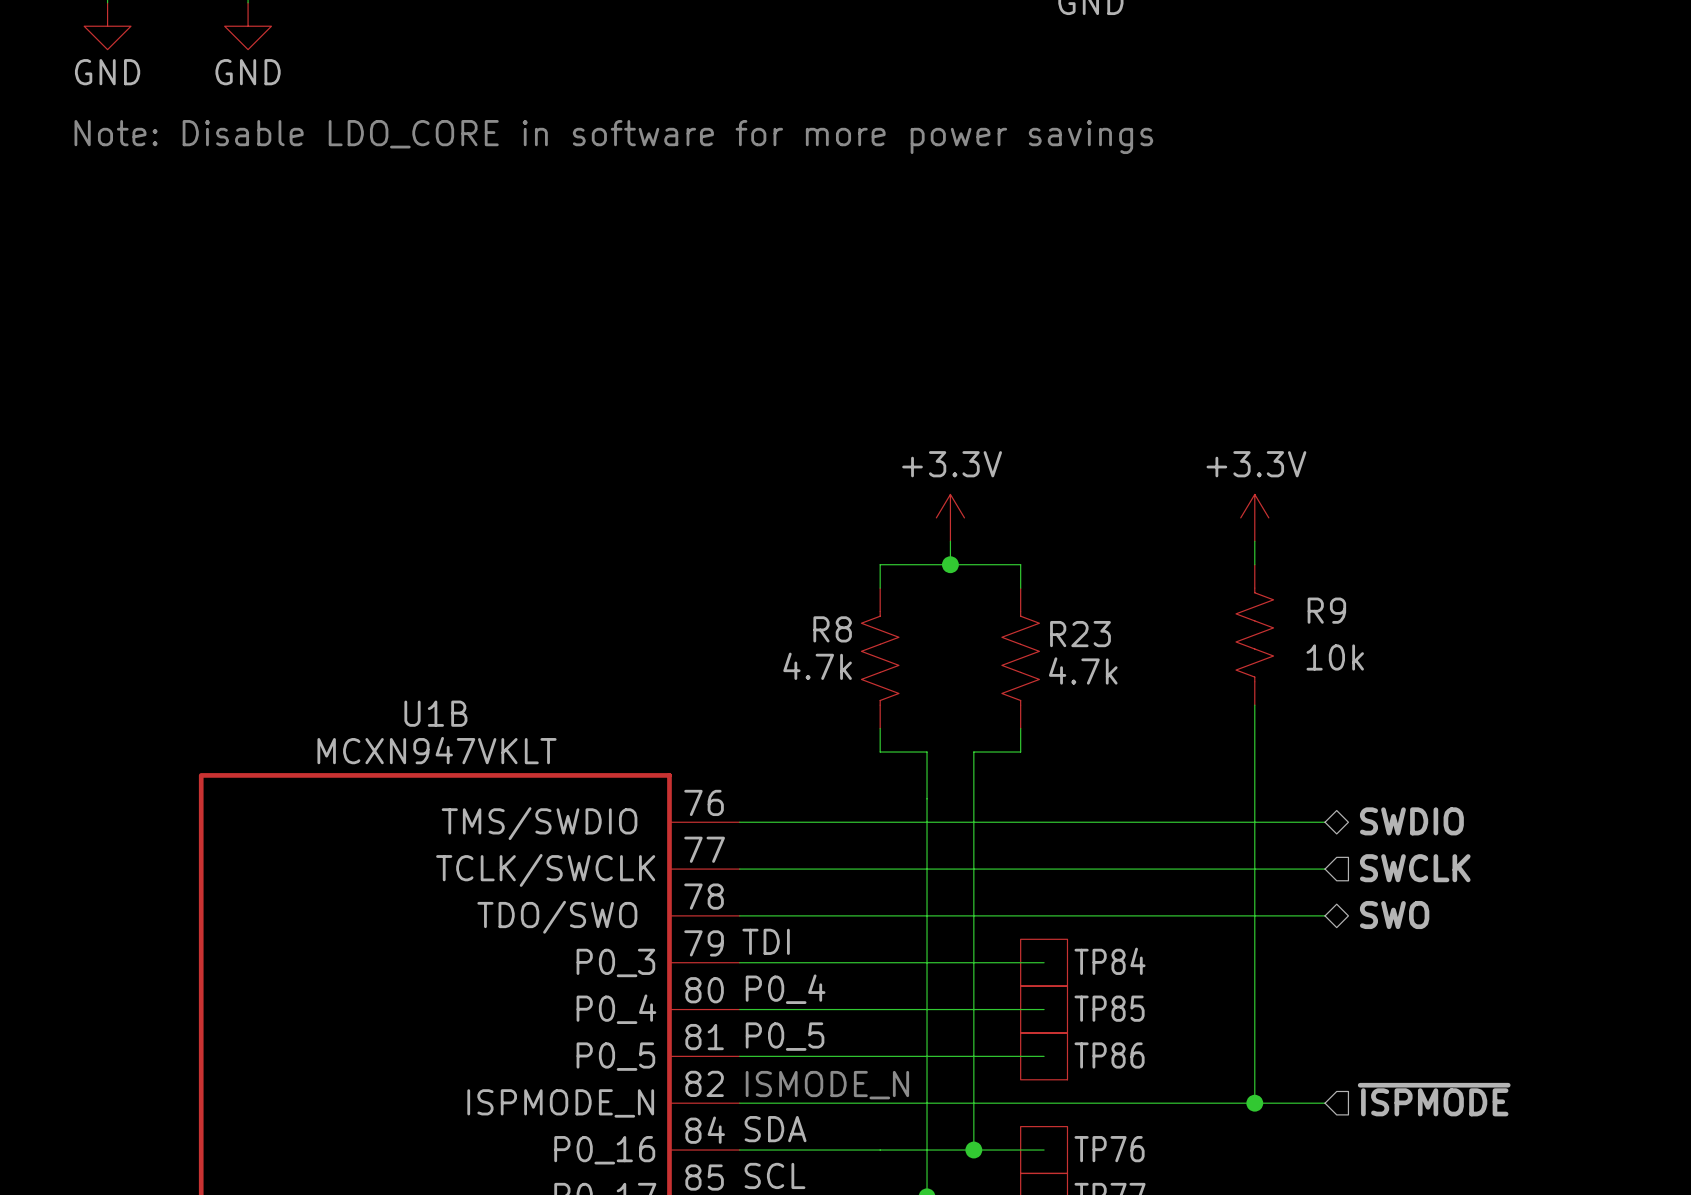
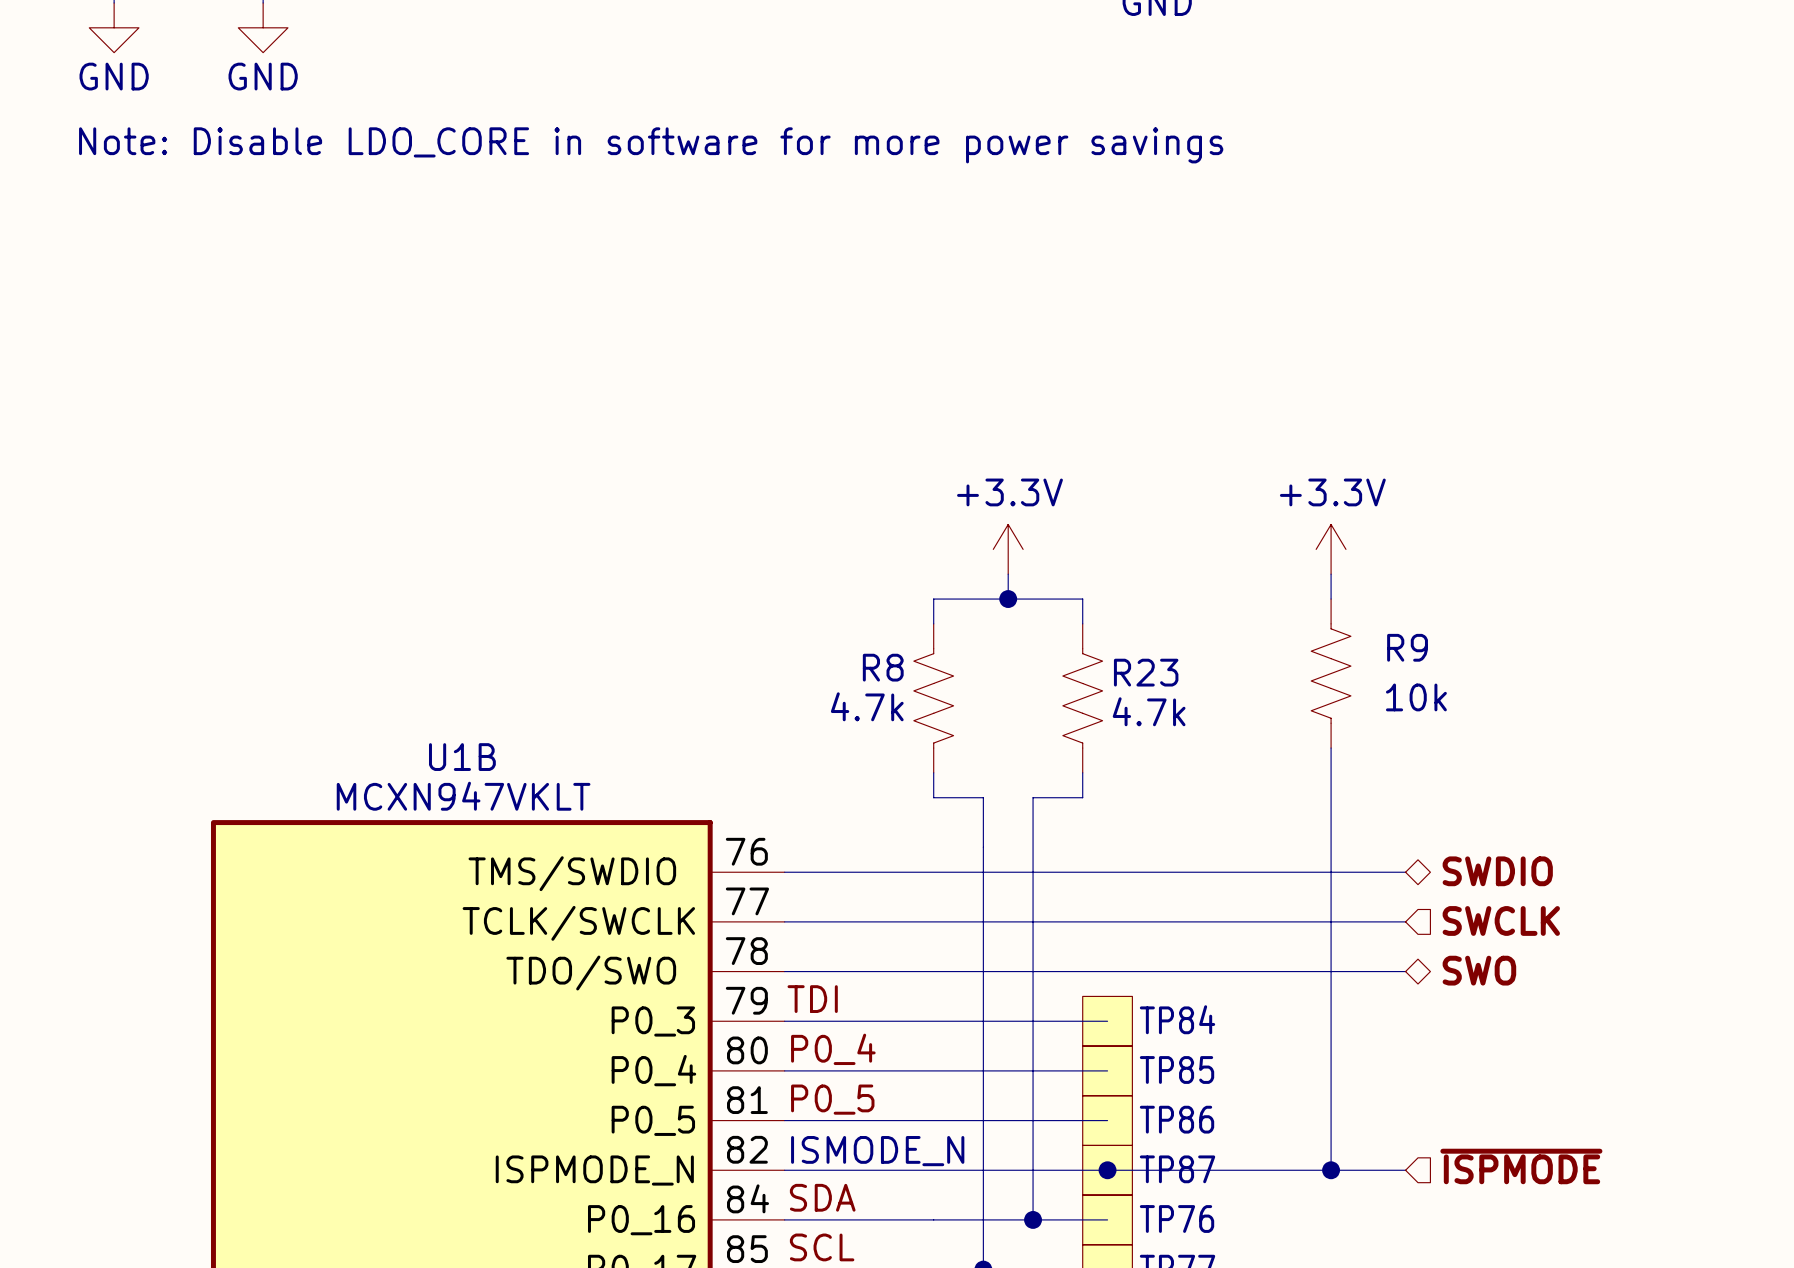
junction: none -> (1107, 1170)
TP87: none -> (1107, 1170)

